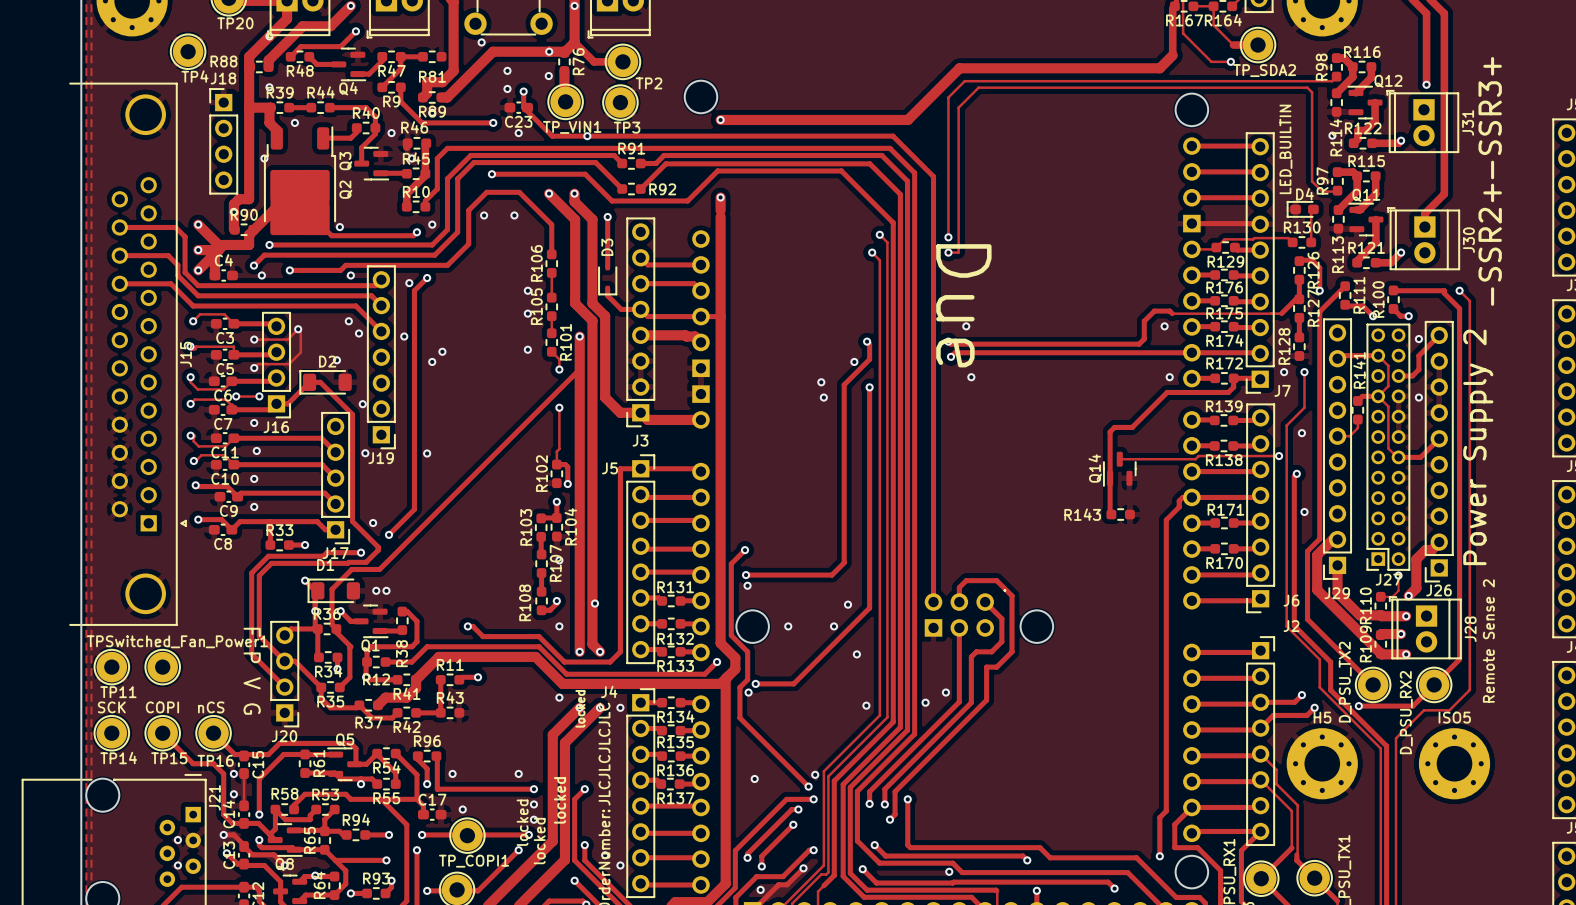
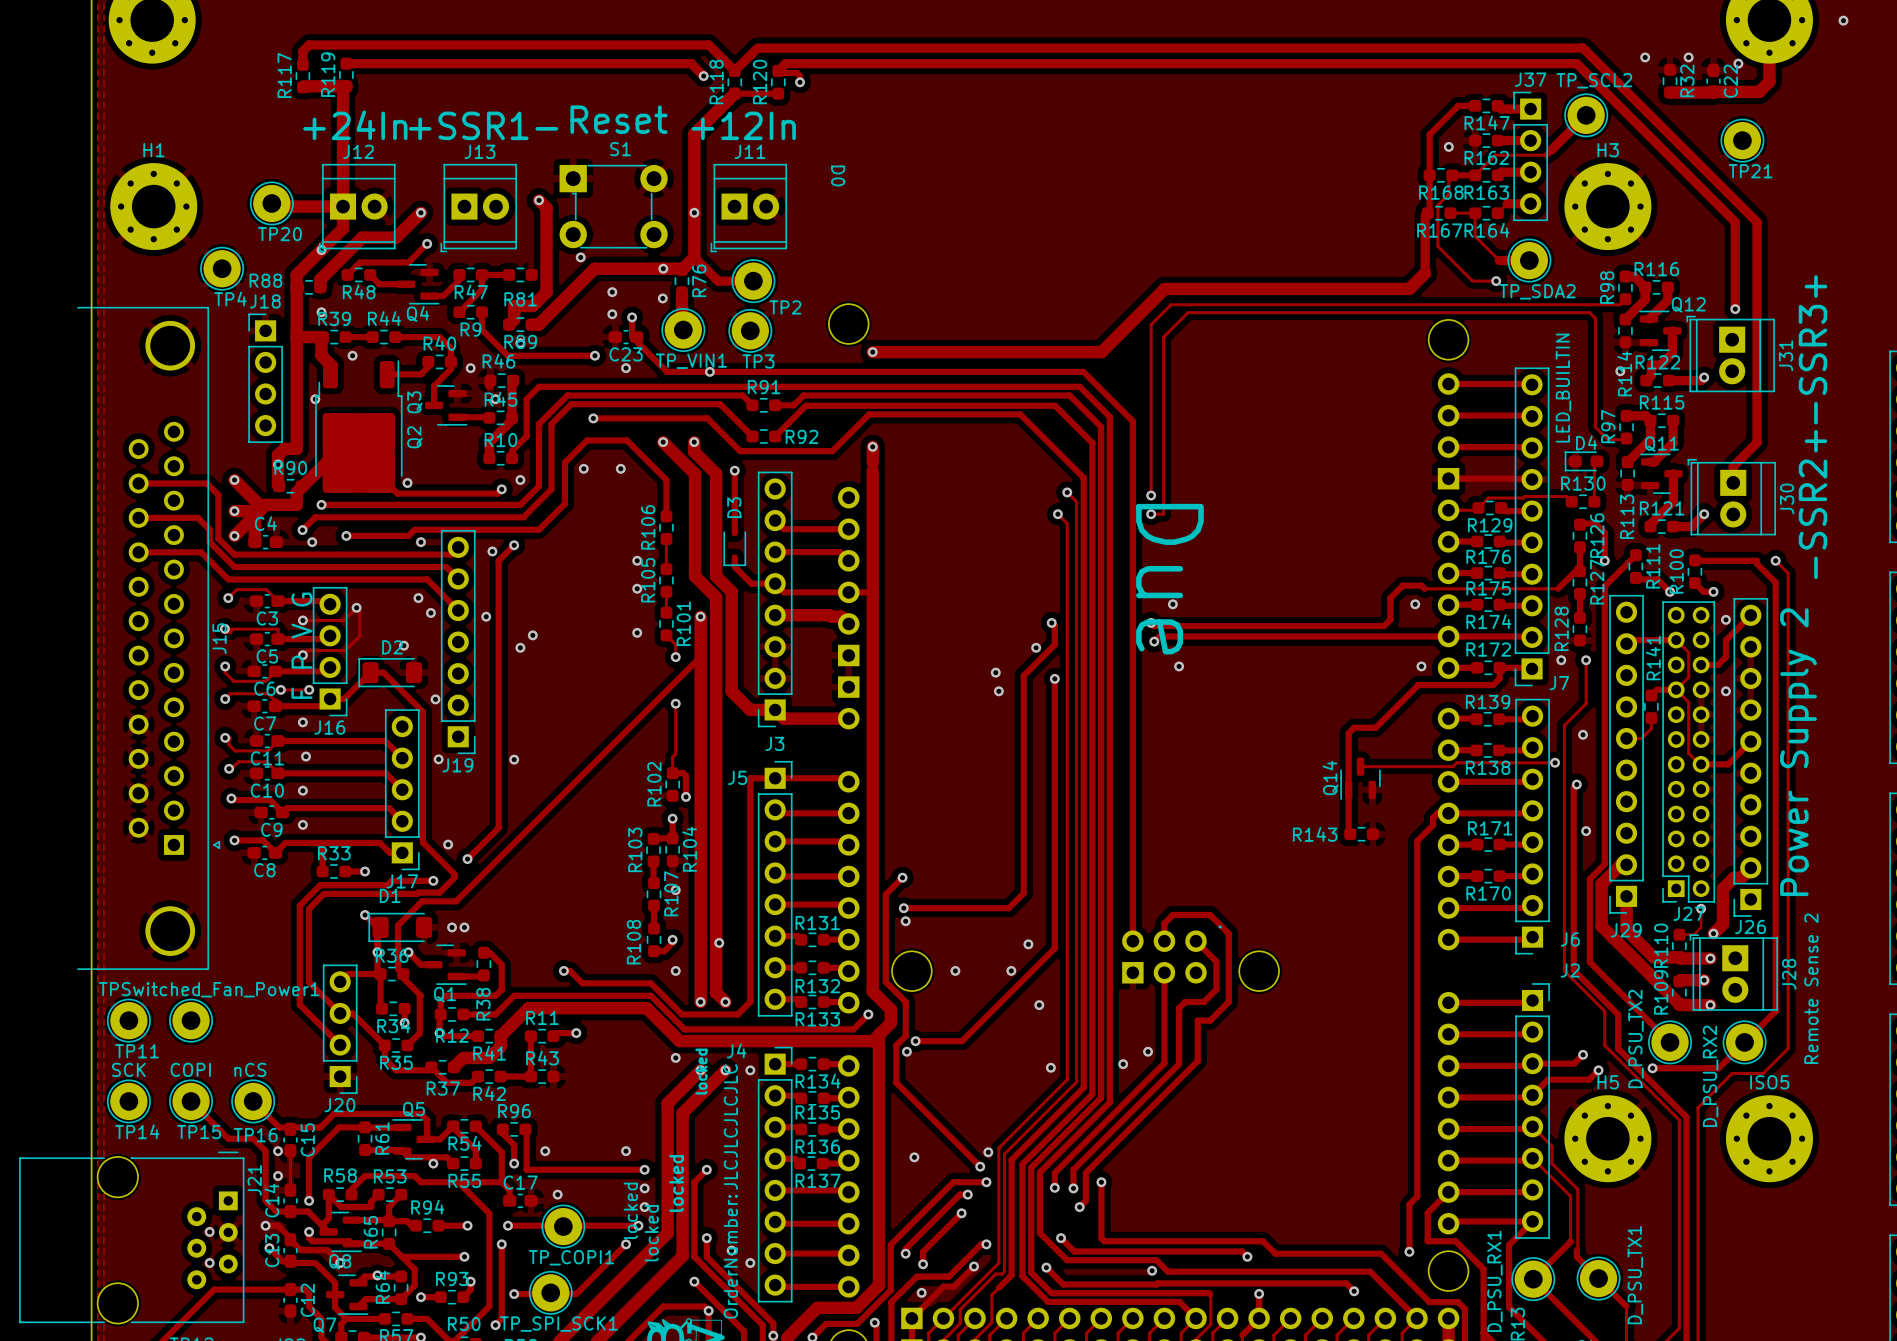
text rotation: 0° (252, 671) -> 180° (301, 645)
text position: F P V G (252, 671) -> F P V G (301, 645)

